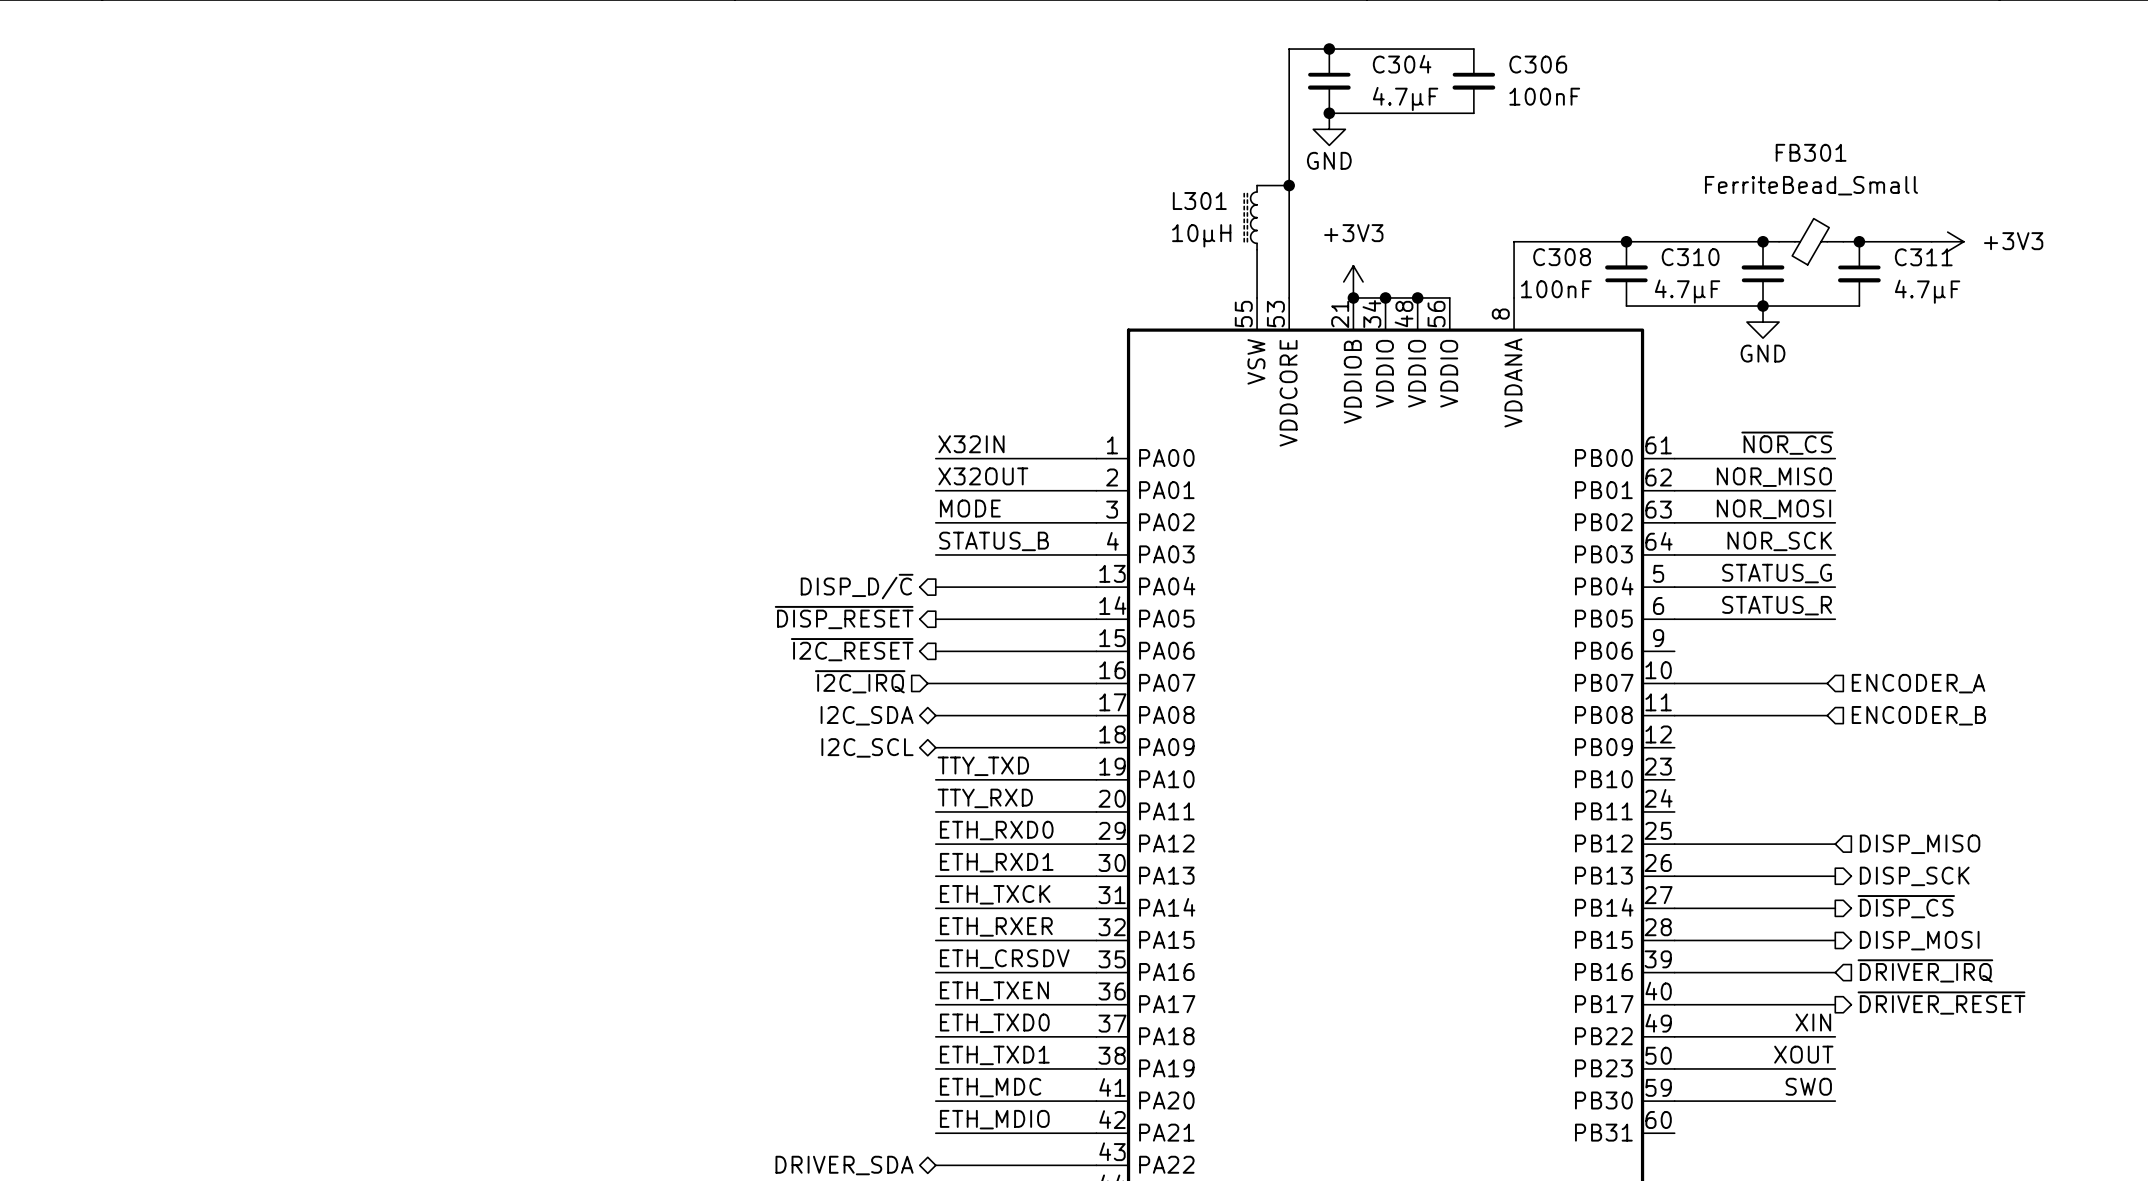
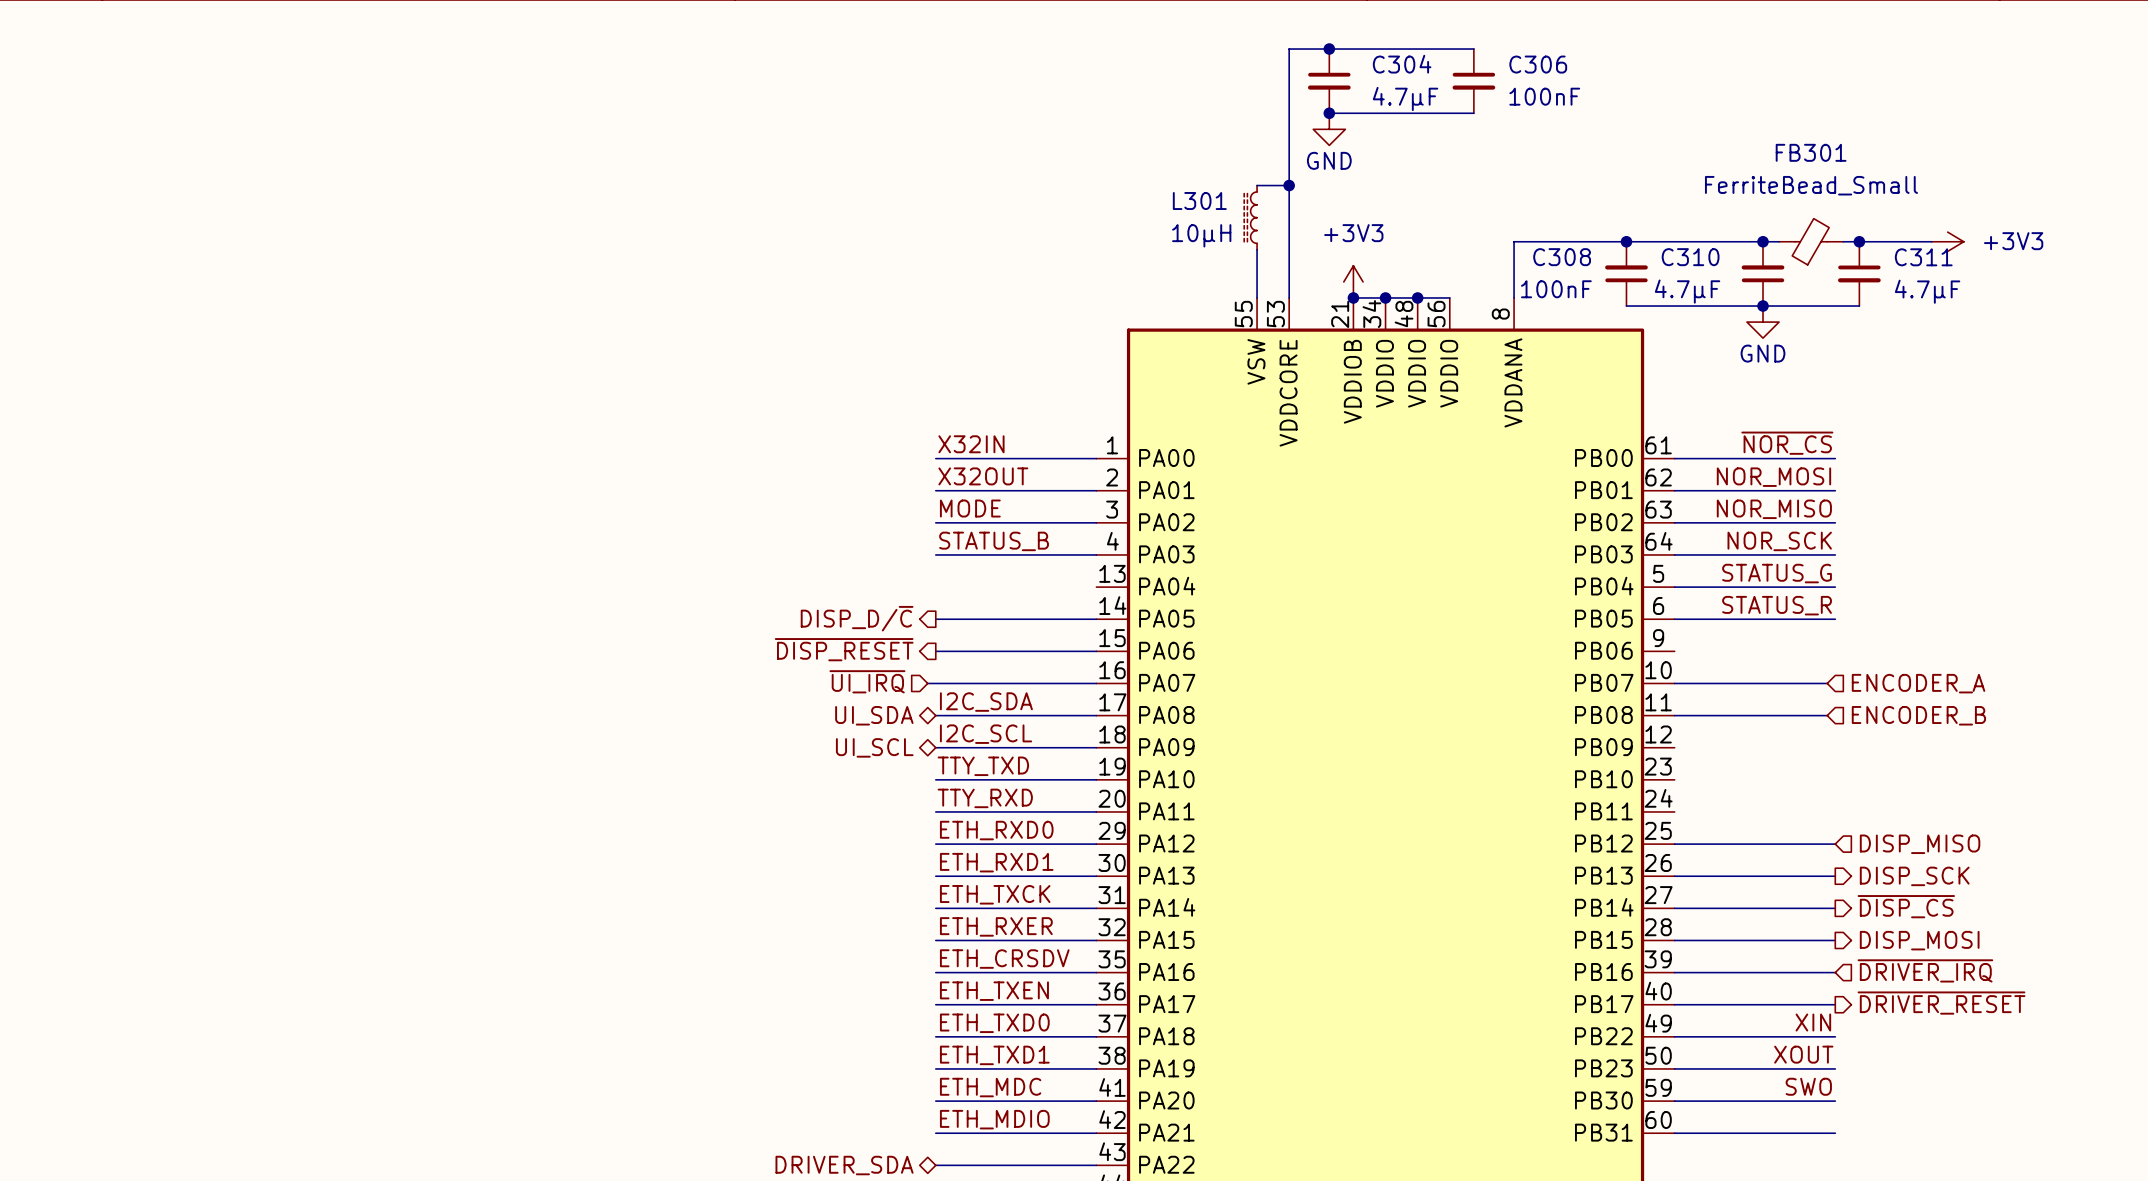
label: NOR_MISO (1774, 477) -> NOR_MOSI (1773, 477)
label: NOR_MOSI (1773, 509) -> NOR_MISO (1774, 509)
hierarchical label: DISP_D/~{C} (857, 586) -> none
wire: (935, 587) (1096, 587) -> none
hierarchical label: ~{DISP_RESET} (844, 617) -> DISP_D/~{C} (857, 618)
hierarchical label: ~{I2C_RESET} (852, 649) -> ~{DISP_RESET} (844, 649)
hierarchical label: ~{I2C_IRQ} (860, 681) -> ~{UI_IRQ} (867, 681)
label: none -> I2C_SDA (986, 702)
hierarchical label: I2C_SDA (867, 715) -> UI_SDA (874, 715)
label: none -> I2C_SCL (986, 734)
hierarchical label: I2C_SCL (867, 747) -> UI_SCL (874, 747)
wire: none -> (1674, 1133) (1835, 1133)

